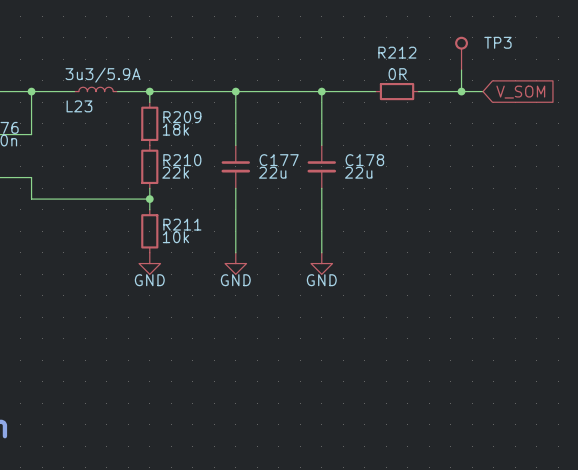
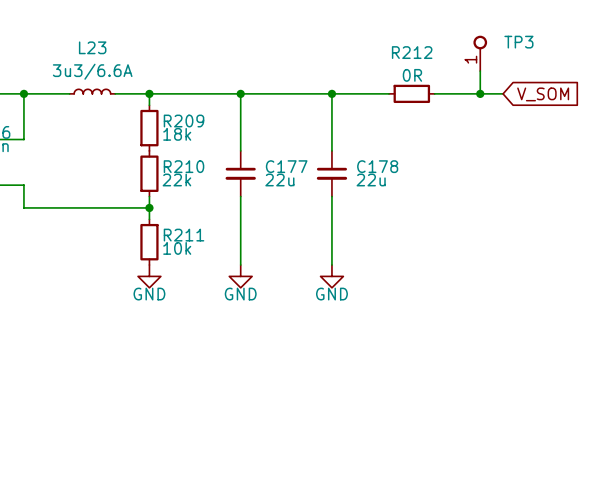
TP3 pin number: none -> 1 (470, 59)
L23 text: 3u3/5.9A (103, 75) -> 3u3/6.6A (92, 71)
L23 name position: L23 (79, 106) -> L23 (92, 47)

